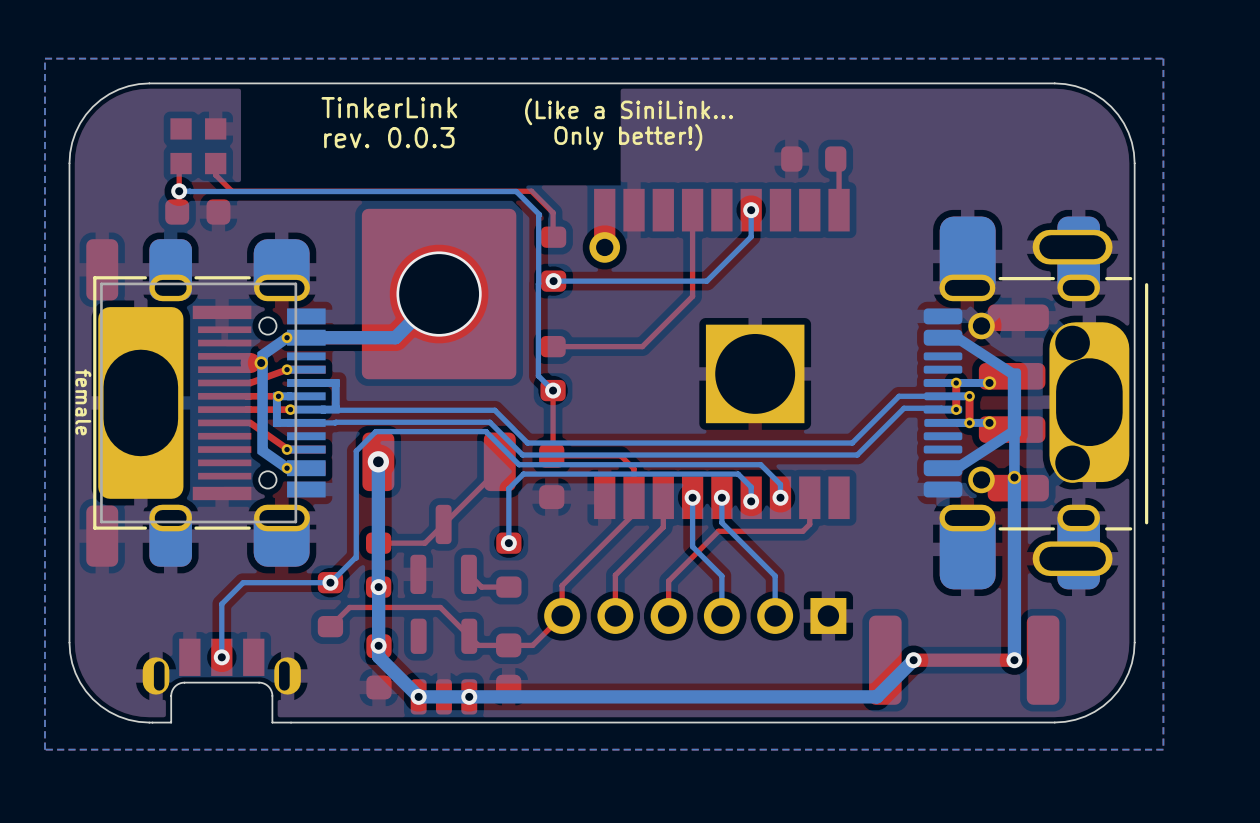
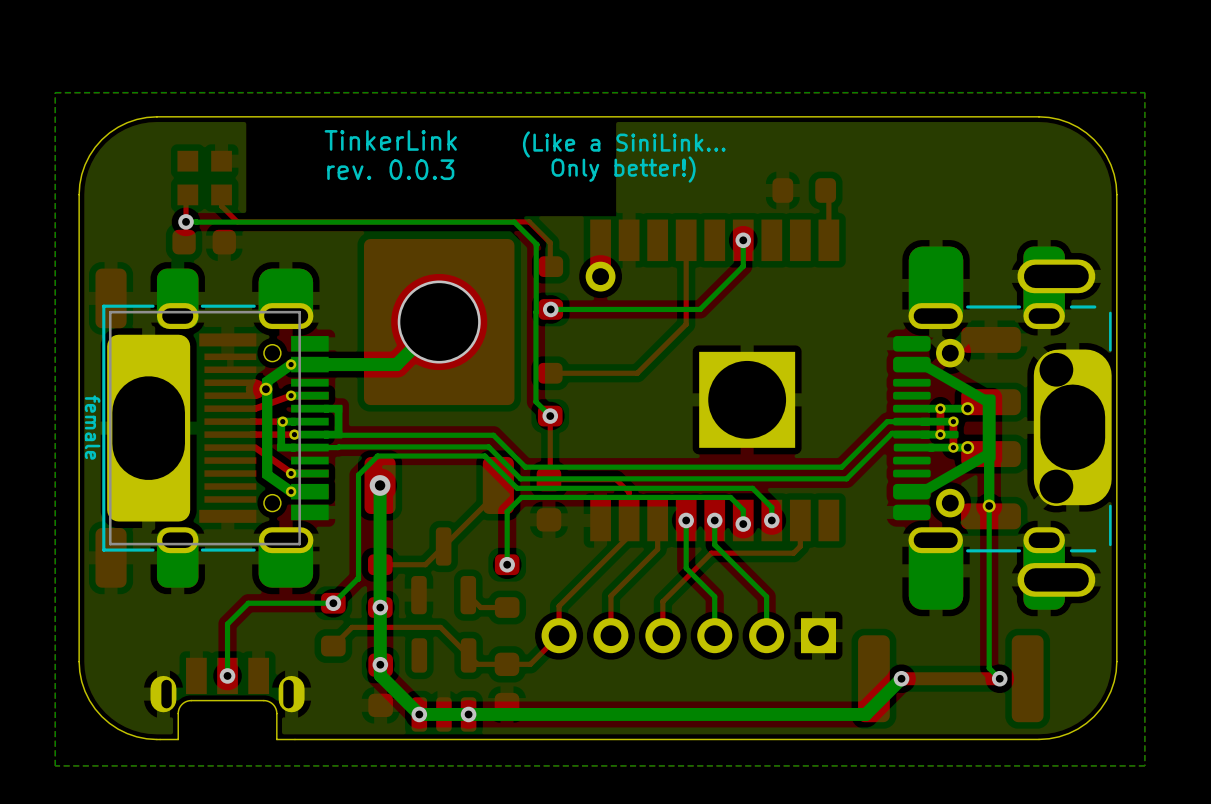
part footprint: [923, 216, 1149, 590] -> [893, 246, 1112, 610]
bottom track: none -> (989, 505) (989, 668) (999, 678)

